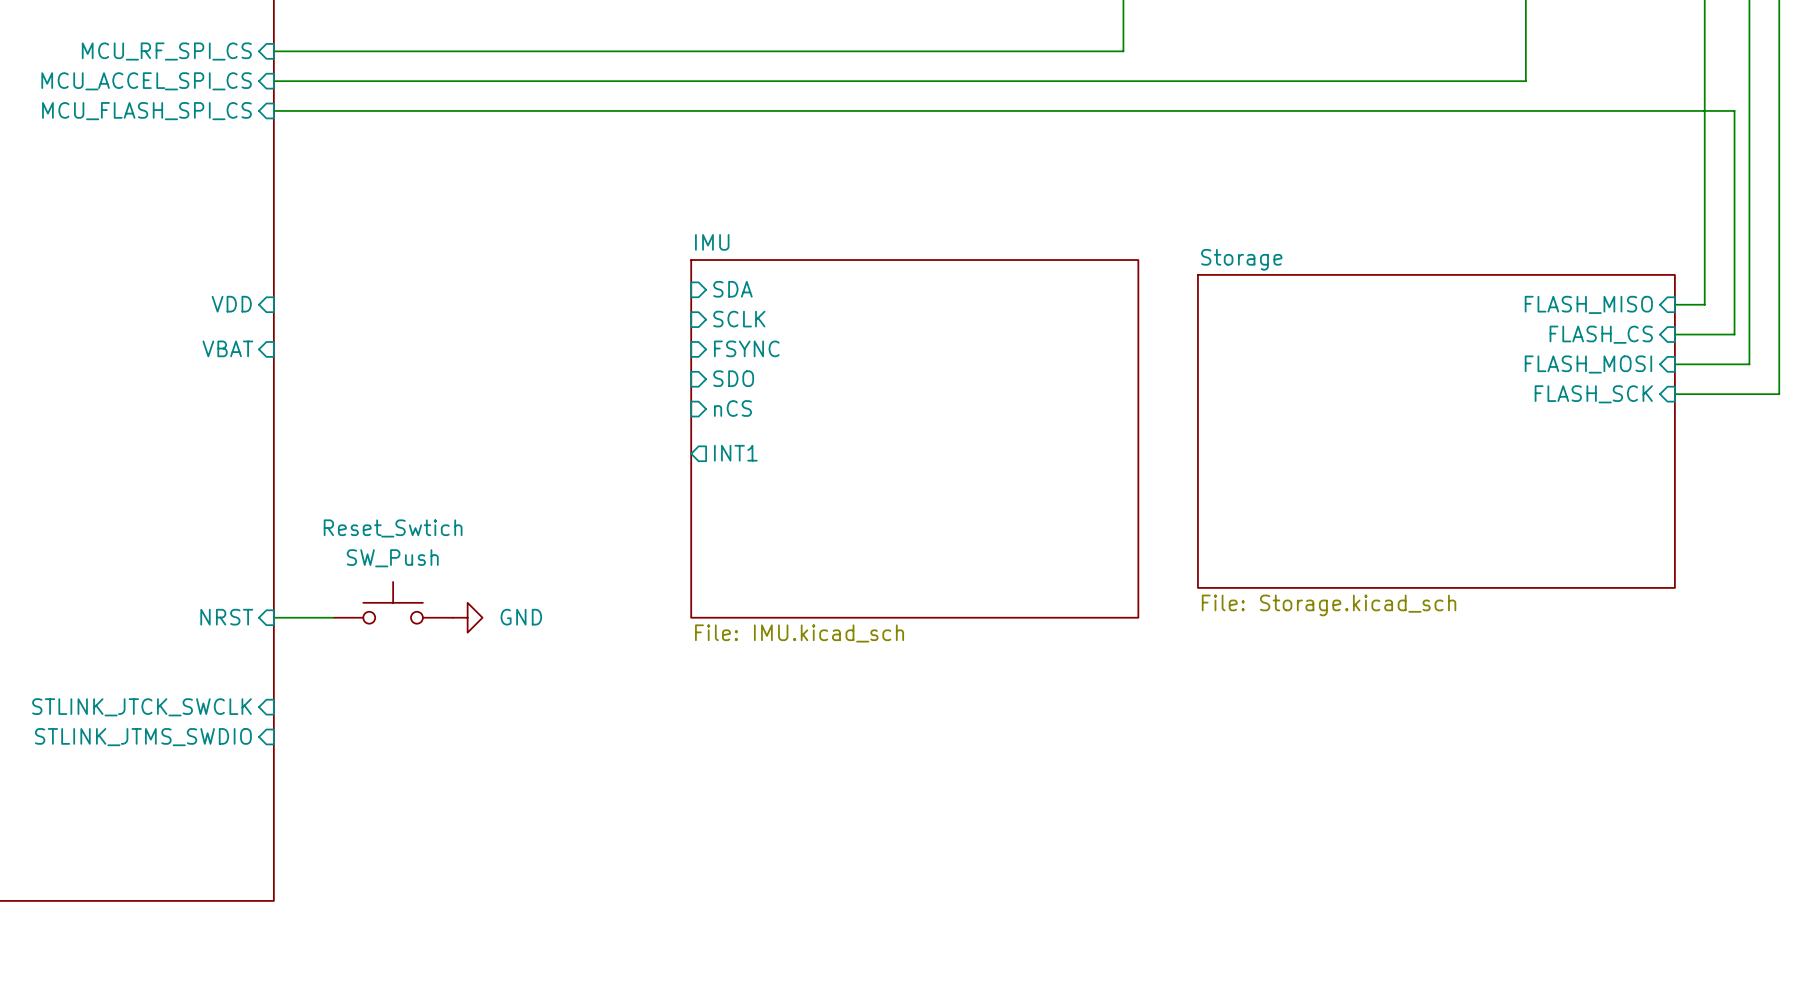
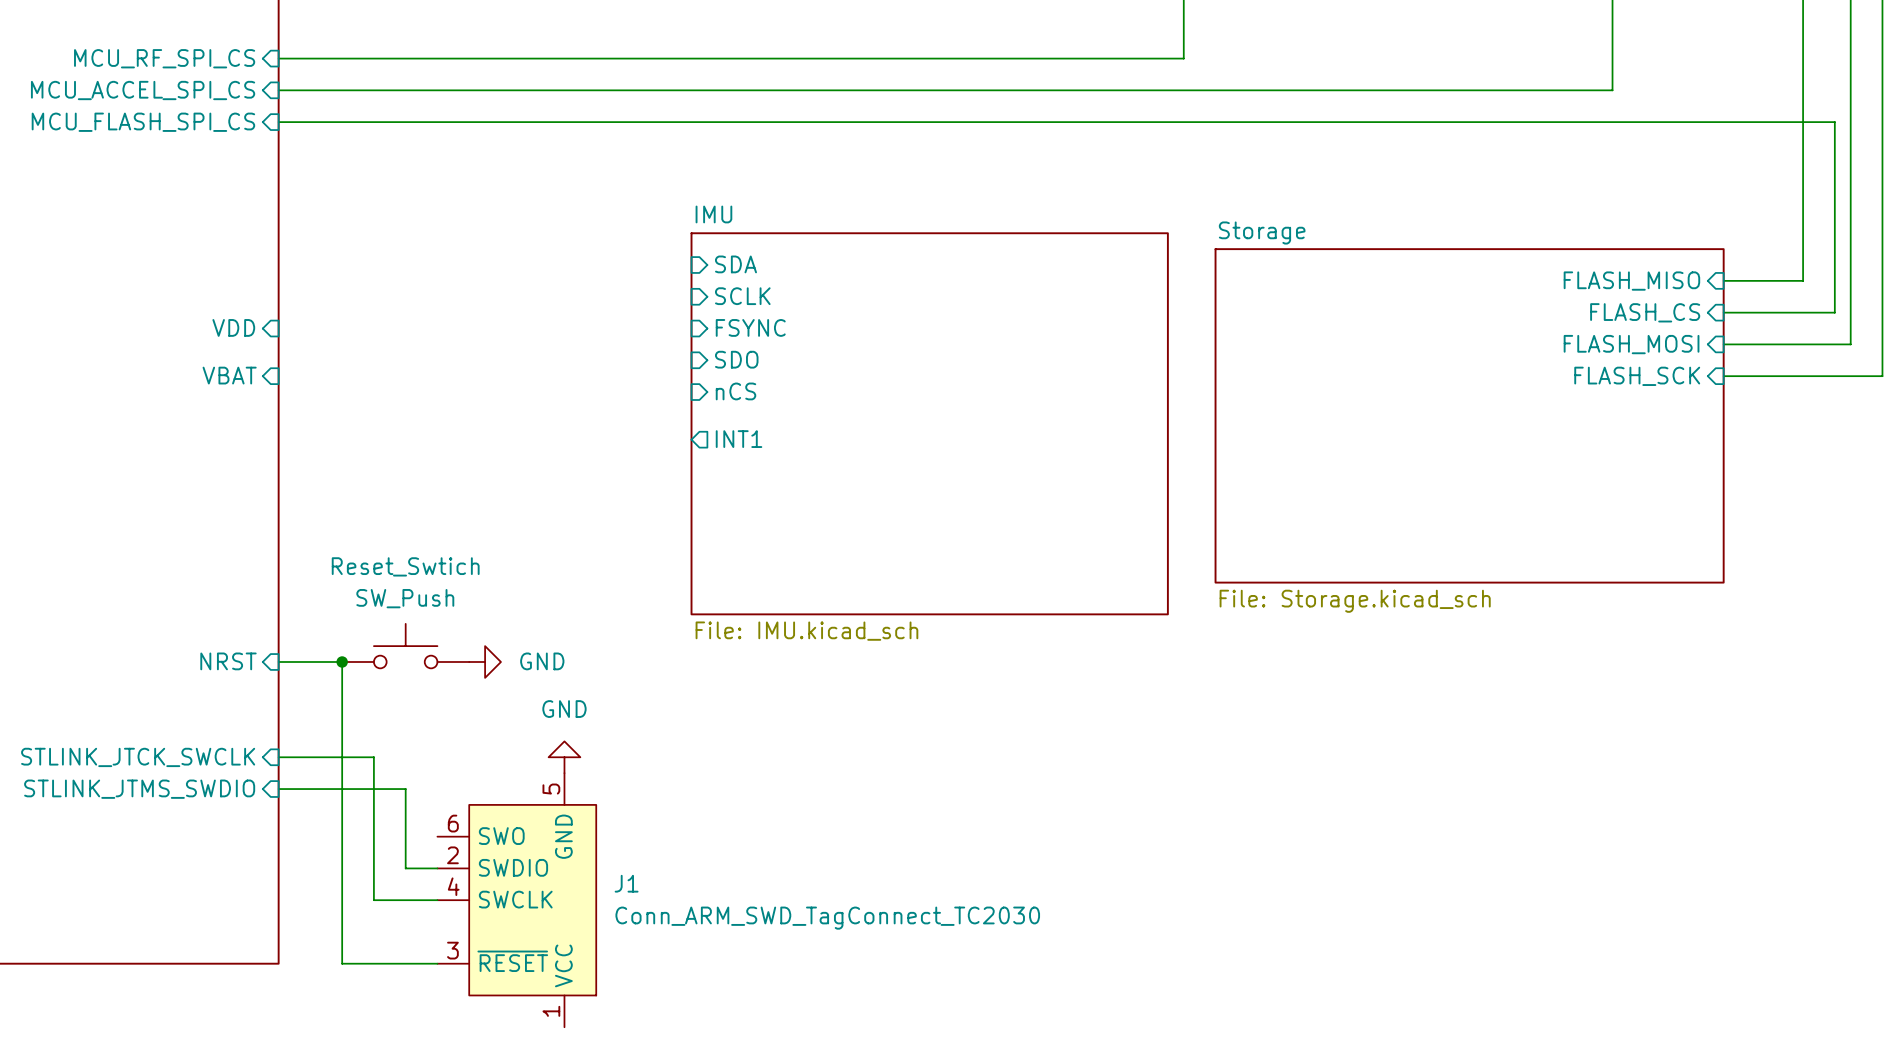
wire: (1704, 260) (1704, 304) (1674, 304) -> (1803, 280) (1723, 280)
sheet pin position: SDA (732, 289) -> SDA (735, 264)
wire: (1734, 289) (1734, 334) (1674, 334) -> (1834, 312) (1723, 312)
sheet pin position: FLASH_MISO (1588, 304) -> FLASH_MISO (1631, 281)
sheet pin position: SCLK (739, 319) -> SCLK (742, 296)
wire: (1749, 319) (1749, 364) (1674, 364) -> (1850, 344) (1723, 344)
sheet pin position: FLASH_CS (1601, 334) -> FLASH_CS (1645, 312)
sheet pin position: FSYNC (746, 348) -> FSYNC (750, 327)
wire: (1779, 349) (1779, 394) (1674, 394) -> (1882, 376) (1723, 376)
sheet pin position: FLASH_MOSI (1588, 364) -> FLASH_MOSI (1631, 344)
sheet pin position: SDO (733, 378) -> SDO (736, 359)
sheet pin position: FLASH_SCK (1593, 394) -> FLASH_SCK (1637, 376)
sheet pin position: nCS (732, 408) -> nCS (735, 391)
sheet Storage position: (1436, 431) -> (1469, 415)
sheet IMU position: (914, 438) -> (929, 423)
sheet pin position: INT1 (735, 453) -> INT1 (739, 439)
wire: none -> (342, 661) (342, 963) (437, 963)
junction: none -> (342, 661)
wire: none -> (278, 757) (373, 757) (373, 900) (437, 900)
power symbol: none -> GND (564, 757)
wire: none -> (278, 789) (405, 789) (405, 868) (437, 868)
J1: none -> Conn_ARM_SWD_TagConnect_TC2030 (516, 900)

